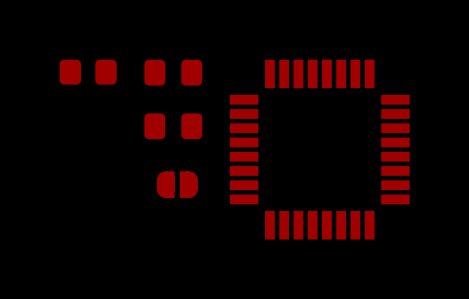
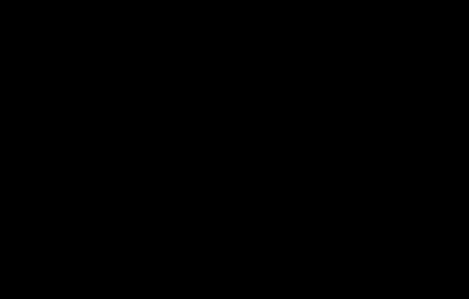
part: (88, 72) -> none
part: (173, 72) -> none
part: (173, 126) -> none
part: (319, 149) -> none
part: (177, 184) -> none

